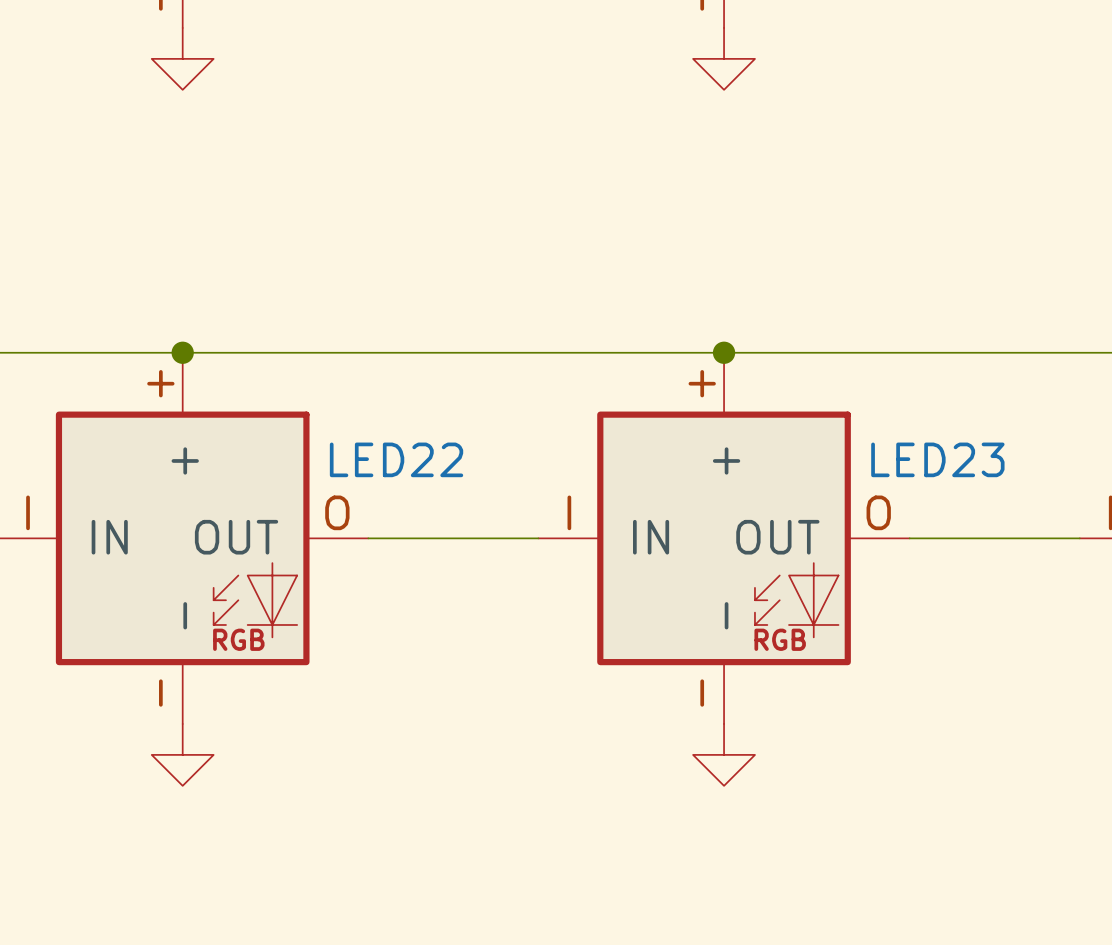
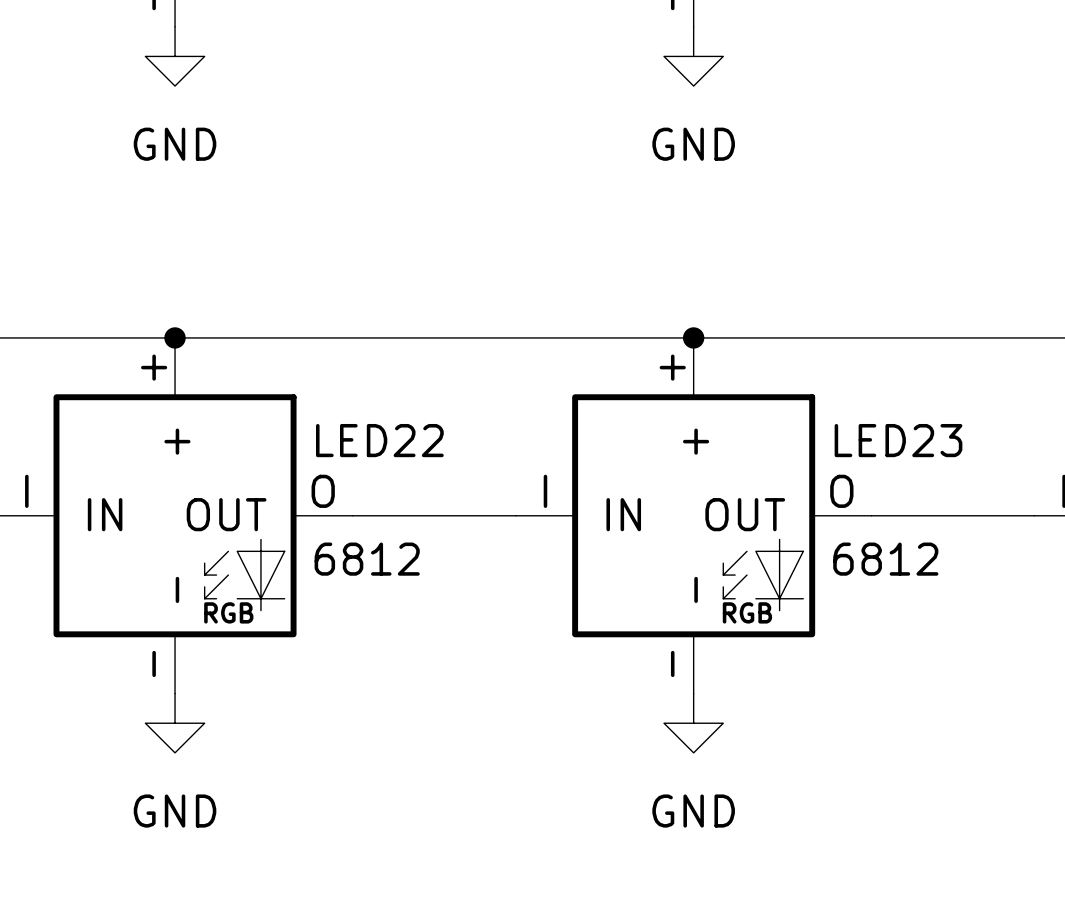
power symbol text: none -> GND (175, 144)
power symbol text: none -> GND (693, 144)
LED22 value: none -> 6812 (367, 559)
LED23 value: none -> 6812 (885, 559)
power symbol text: none -> GND (175, 811)
power symbol text: none -> GND (693, 811)

